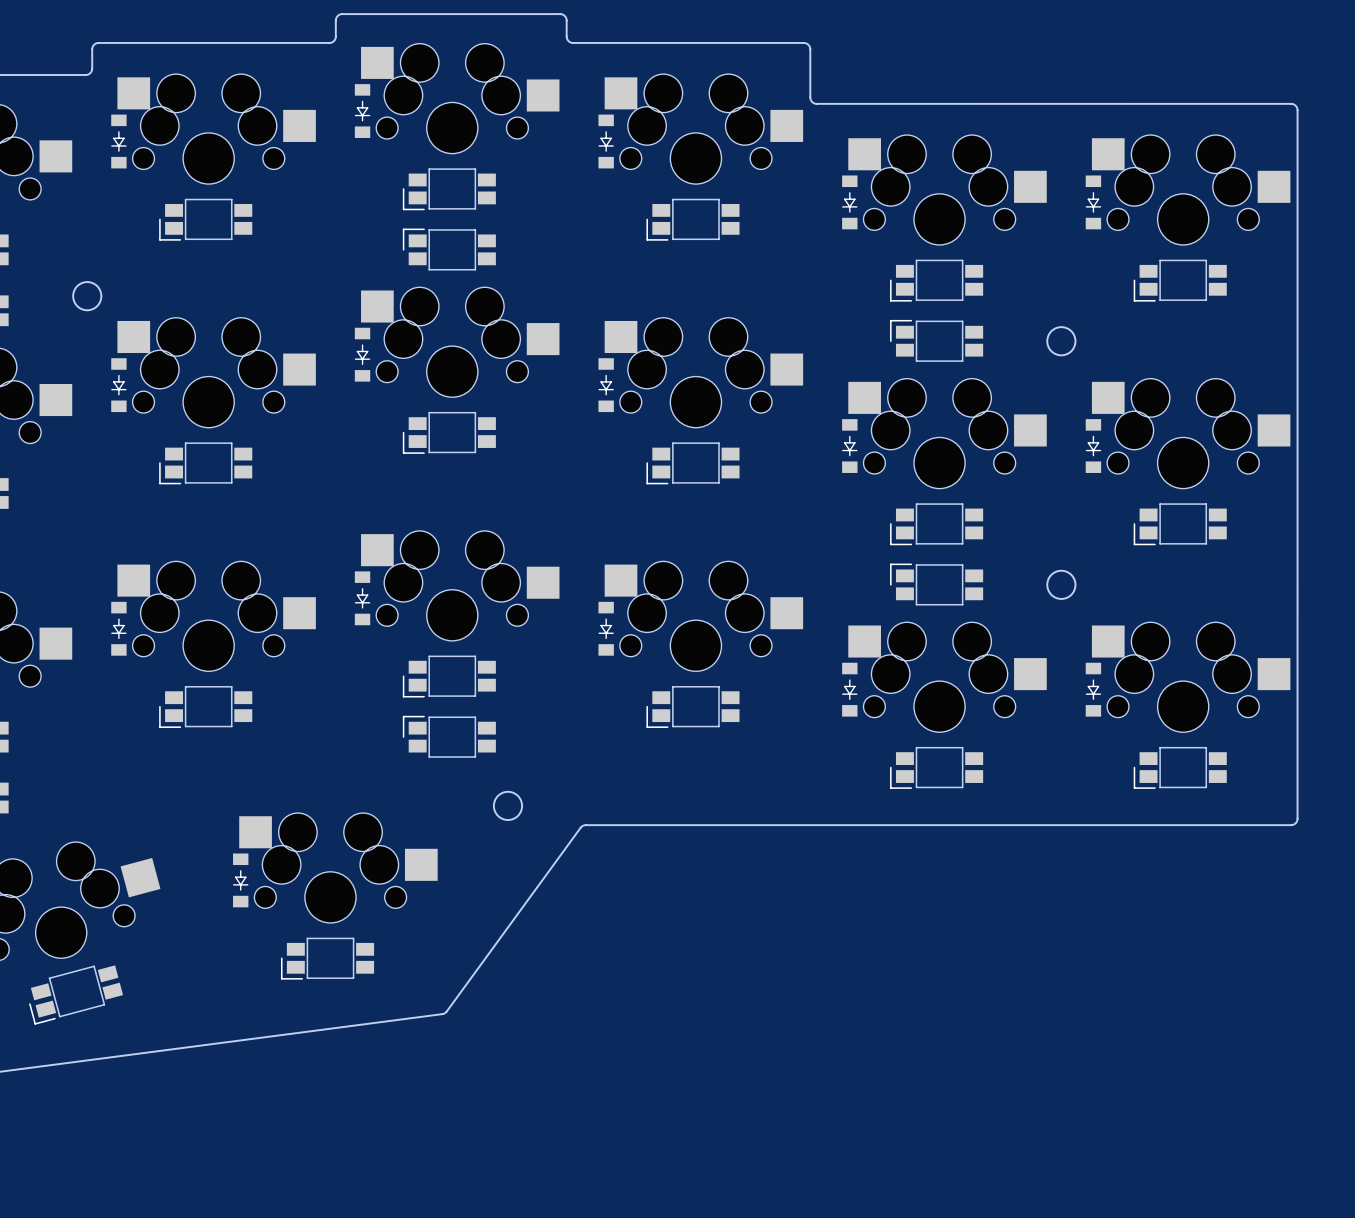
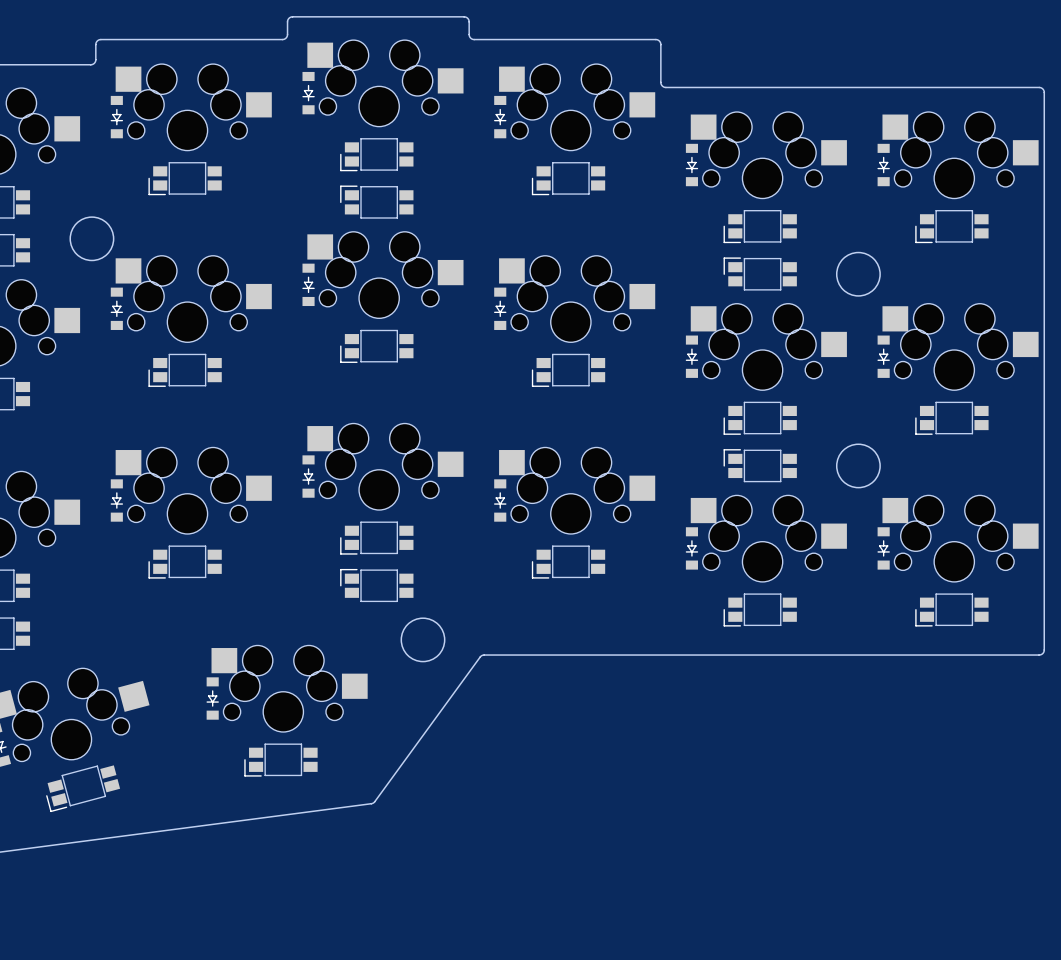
round board edge size: [72, 281, 103, 312] -> [69, 216, 115, 262]
round board edge size: [1046, 326, 1077, 357] -> [835, 251, 881, 297]
round board edge size: [1046, 569, 1077, 600] -> [835, 443, 881, 489]
round board edge size: [492, 790, 524, 821] -> [400, 617, 446, 663]

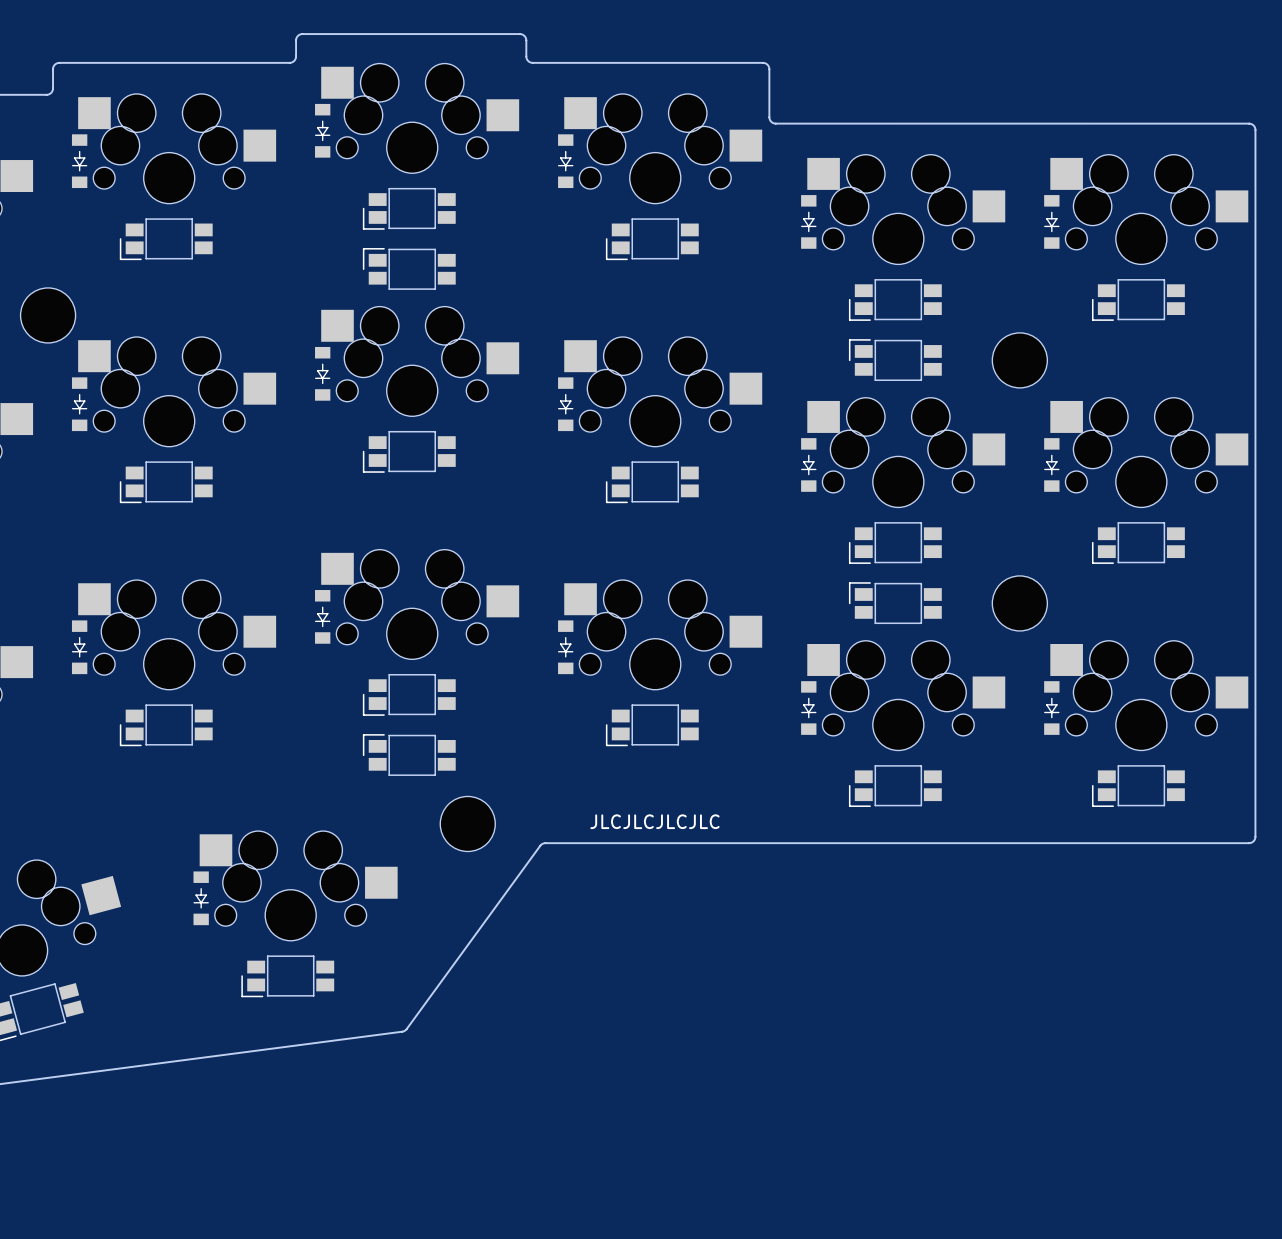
round board edge: [69, 216, 115, 262] -> none
part: none -> (48, 315)
round board edge: [835, 251, 881, 297] -> none
part: none -> (1019, 360)
round board edge: [835, 443, 881, 489] -> none
part: none -> (1019, 603)
round board edge: [400, 617, 446, 663] -> none
text: none -> JLCJLCJLCJLC (654, 821)
part: none -> (467, 823)

